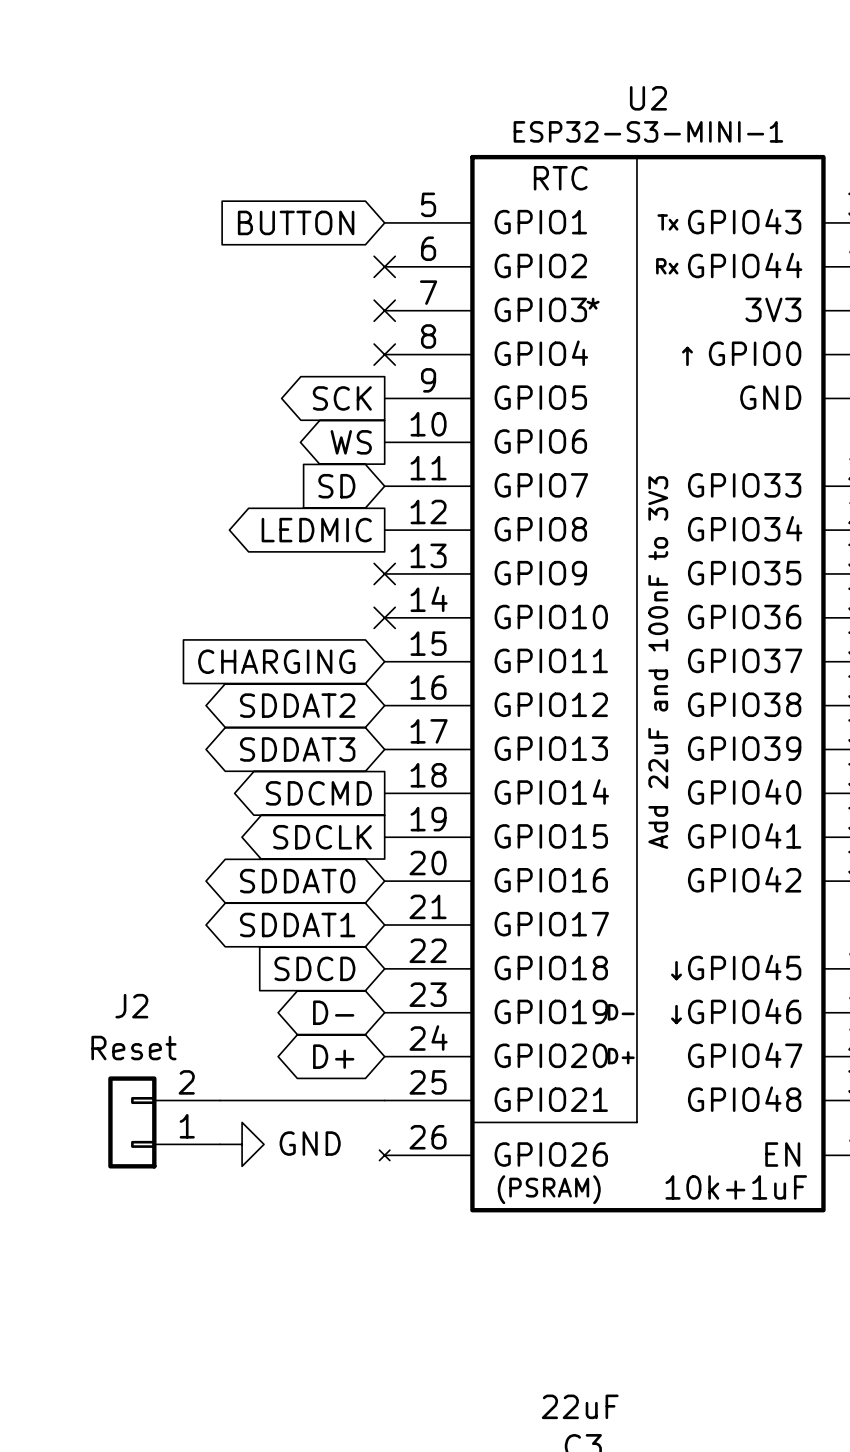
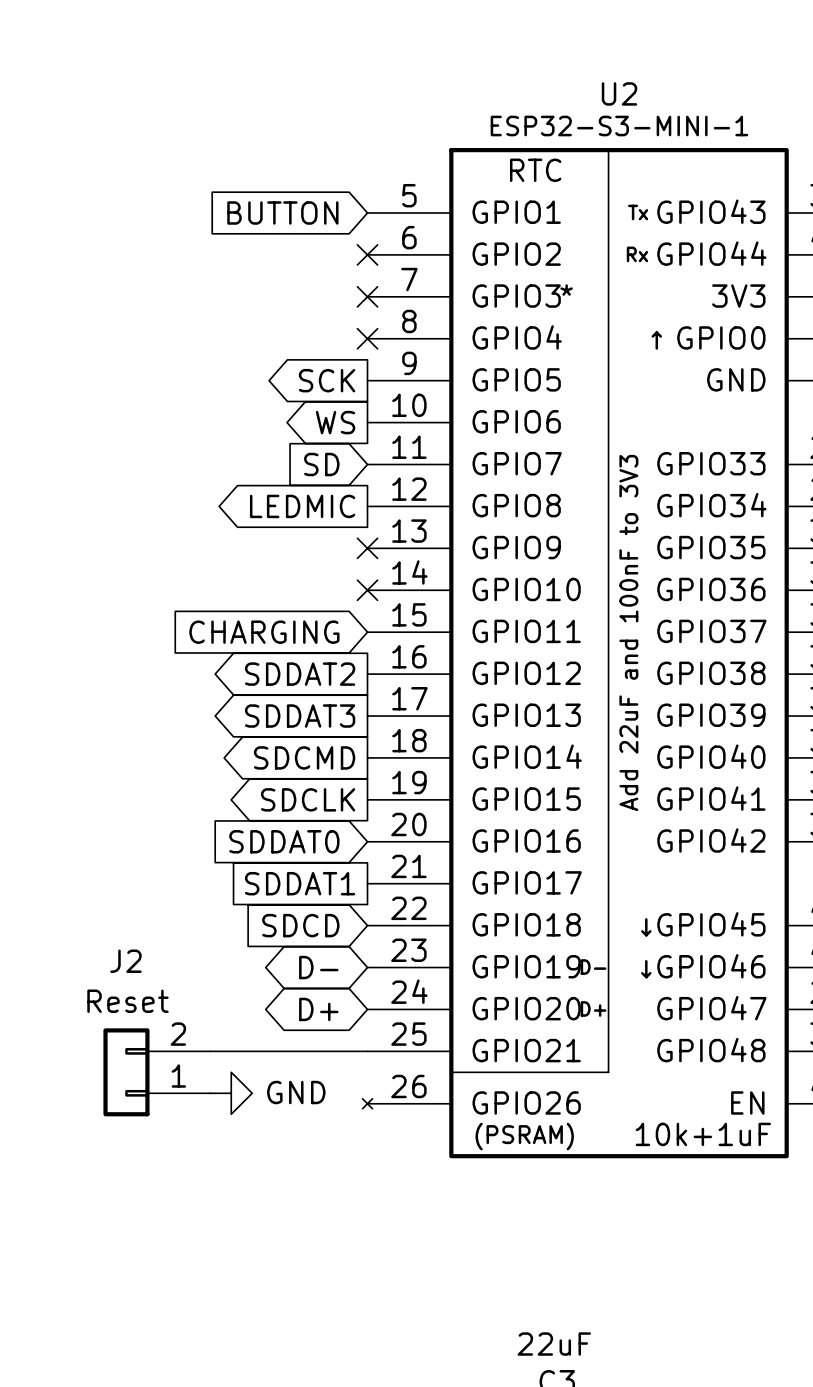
global label shape: bidirectional (297, 705) -> output (300, 674)
global label shape: bidirectional (297, 749) -> output (300, 716)
global label shape: bidirectional (297, 881) -> input (284, 841)
global label shape: bidirectional (297, 924) -> passive (300, 883)

